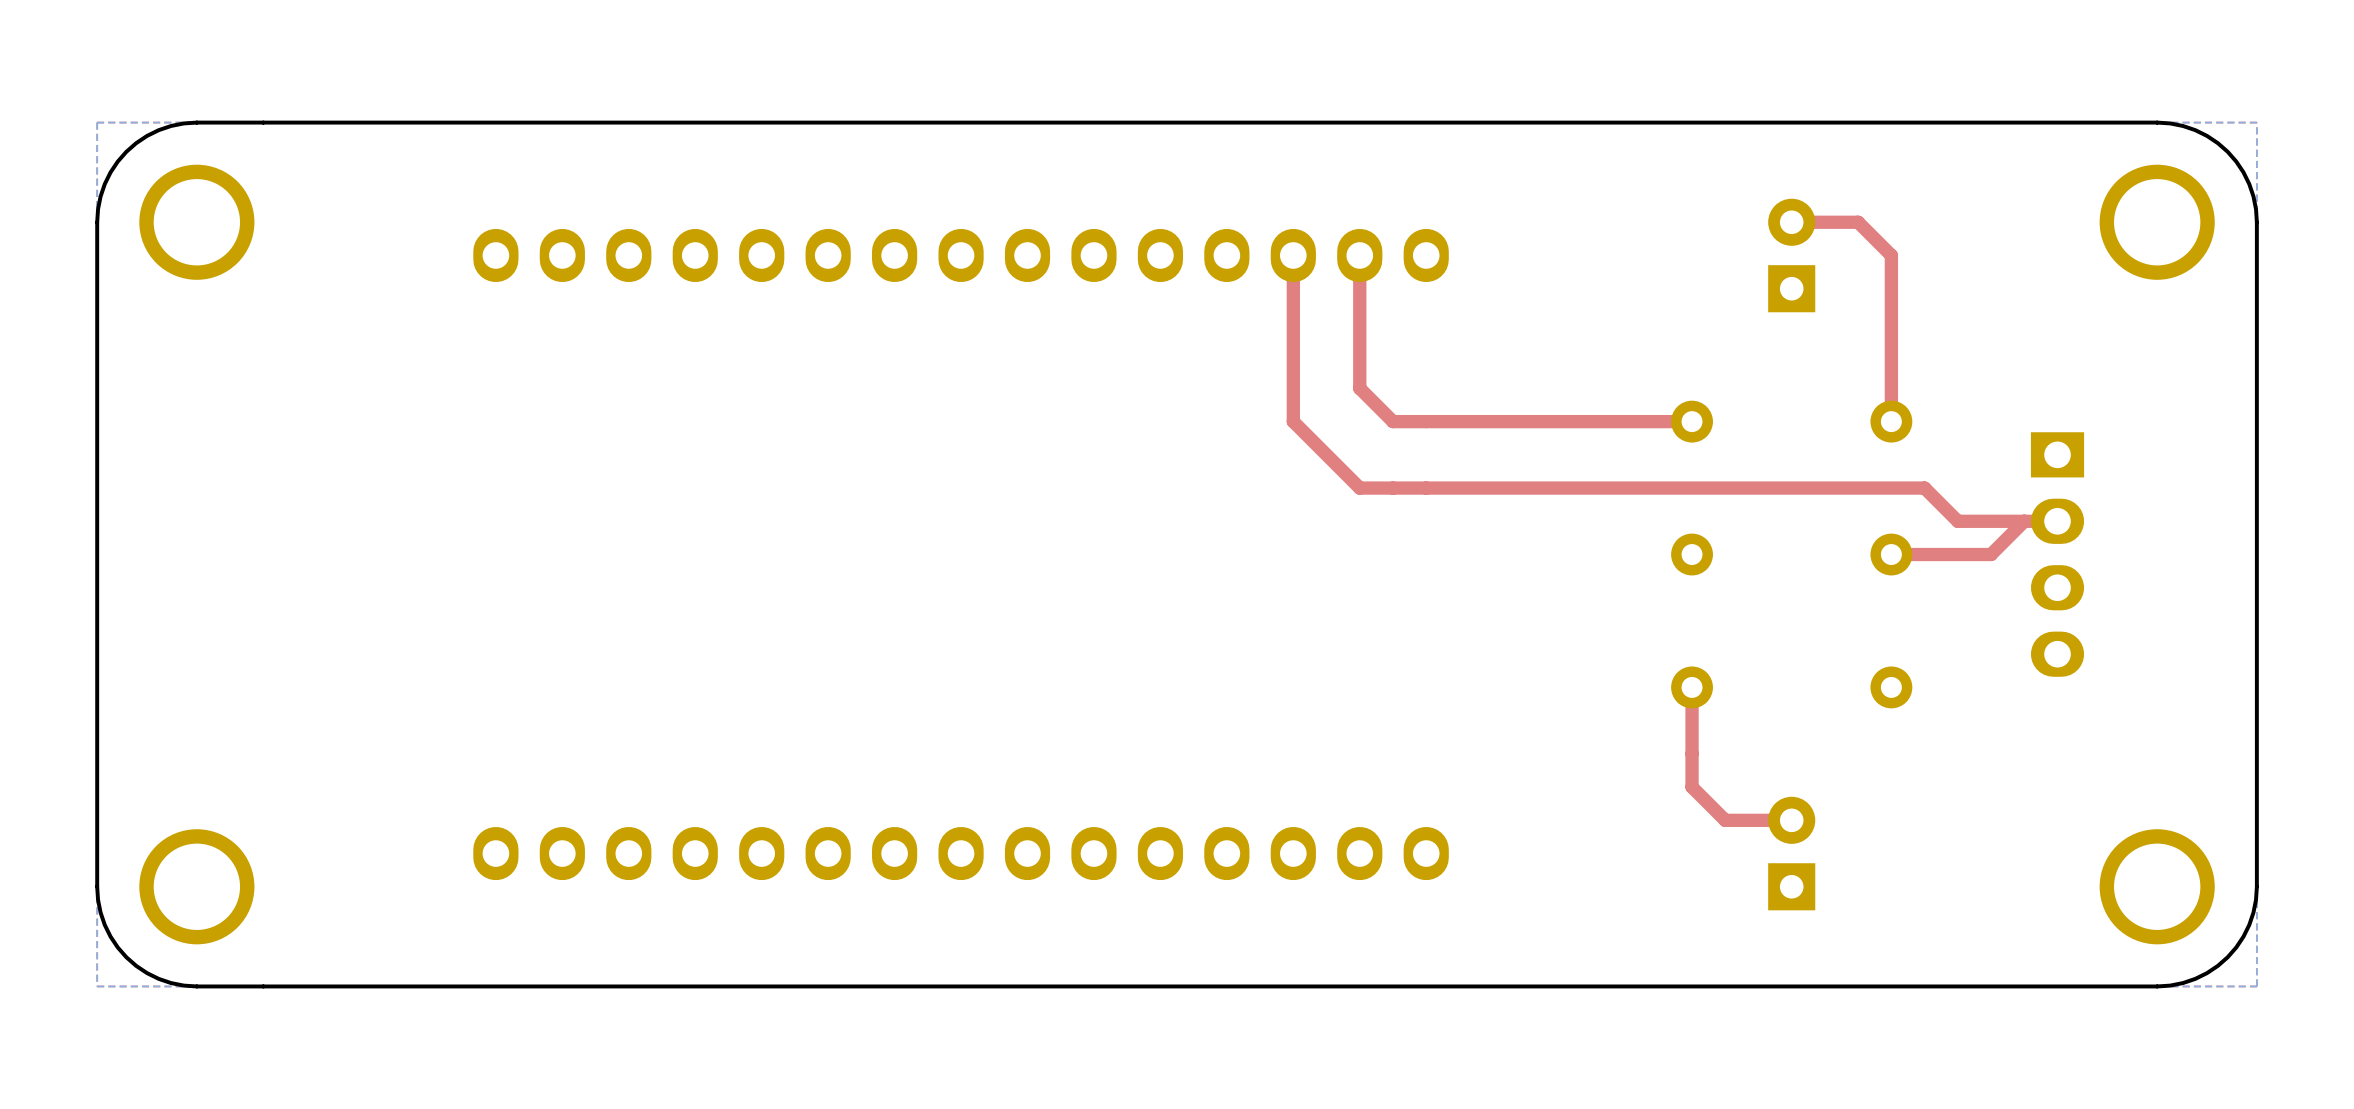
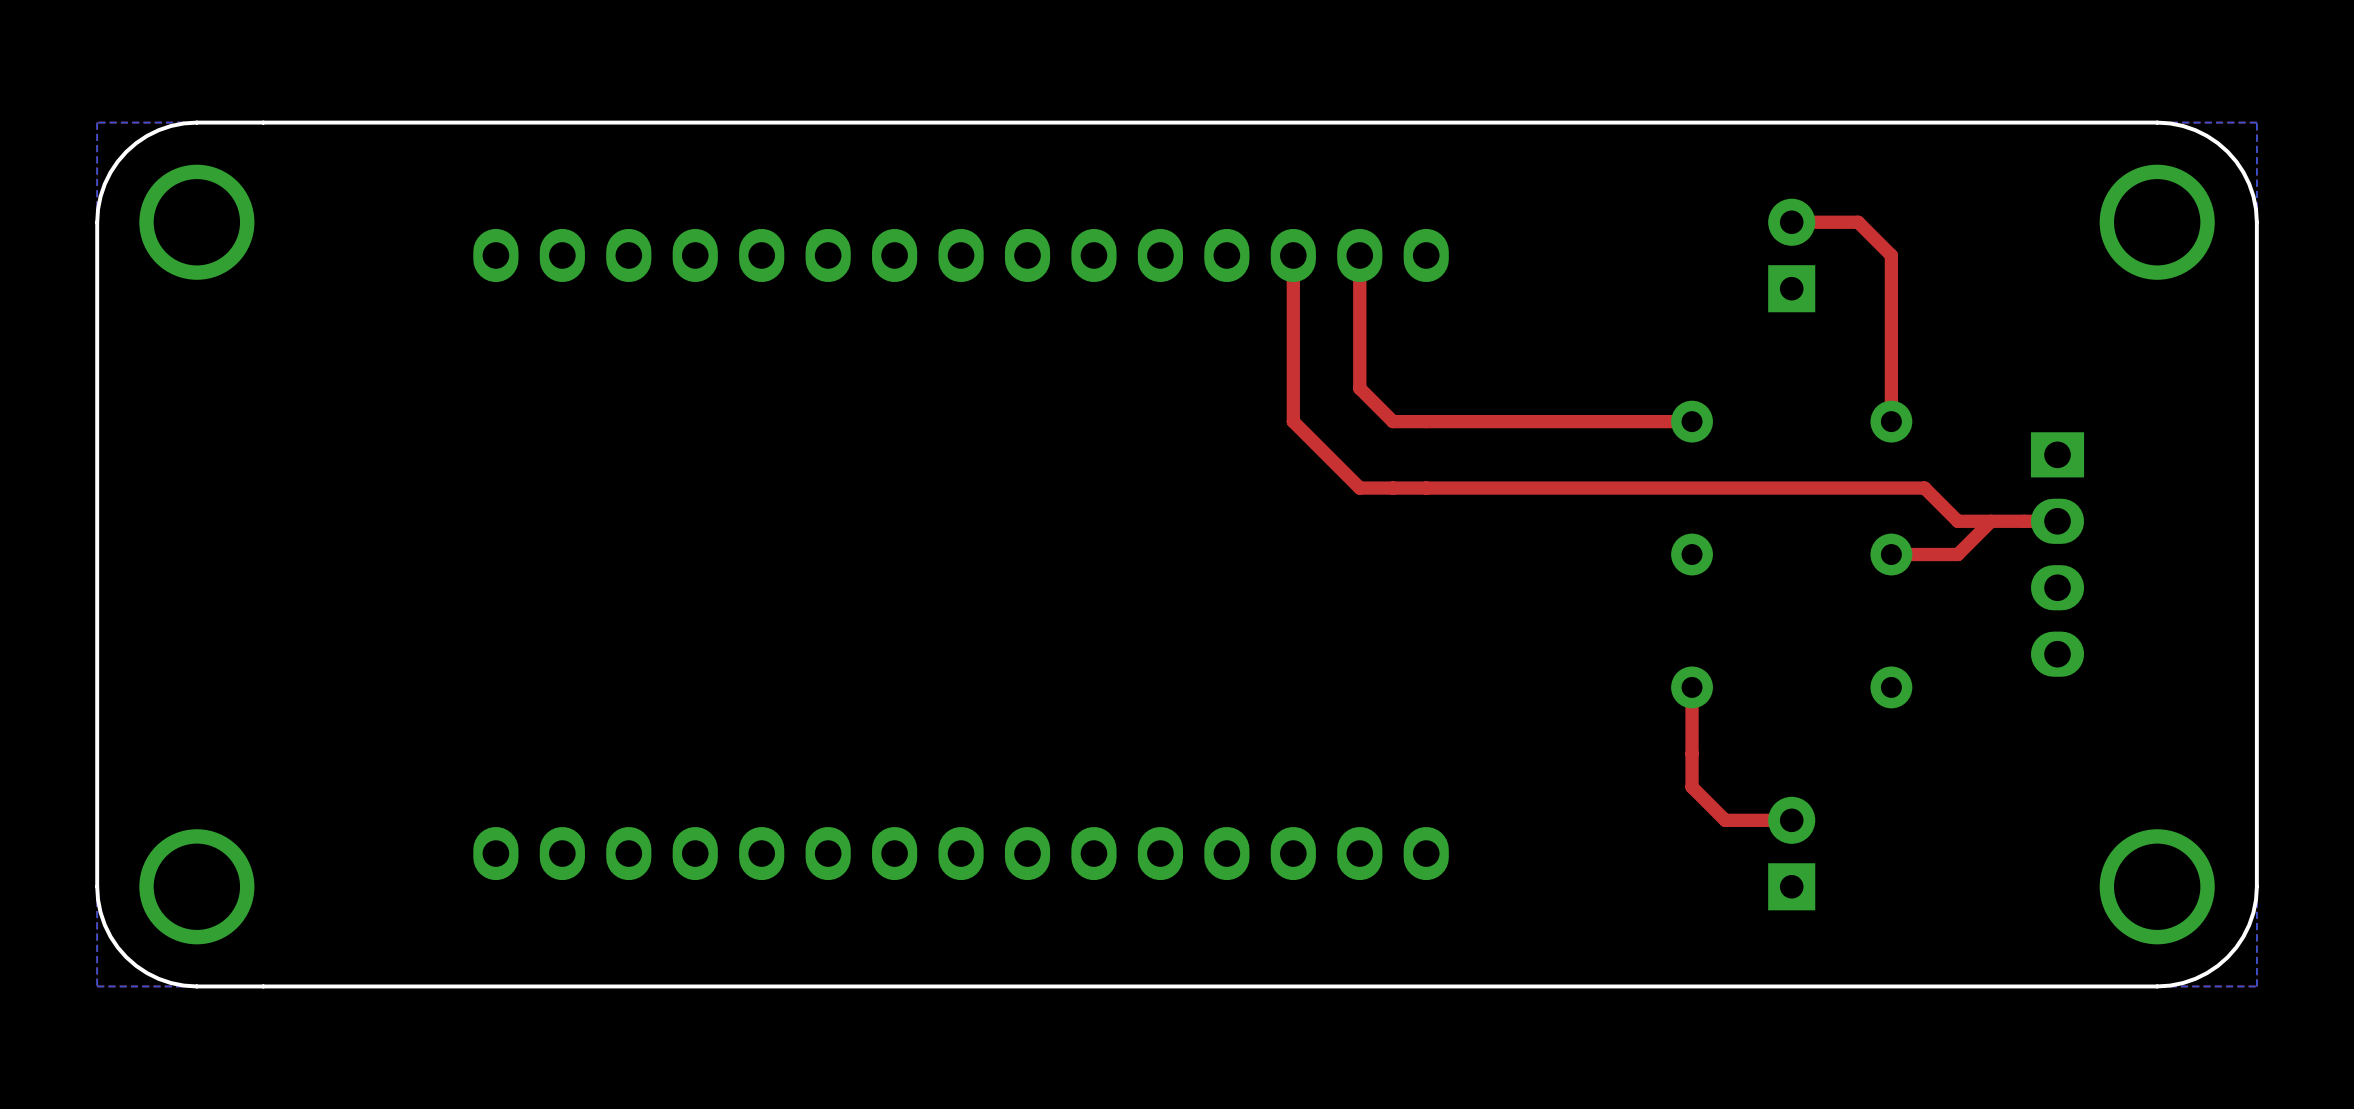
top track: (2024, 521) (1991, 554) (1957, 554) -> (1991, 521) (1957, 554)

